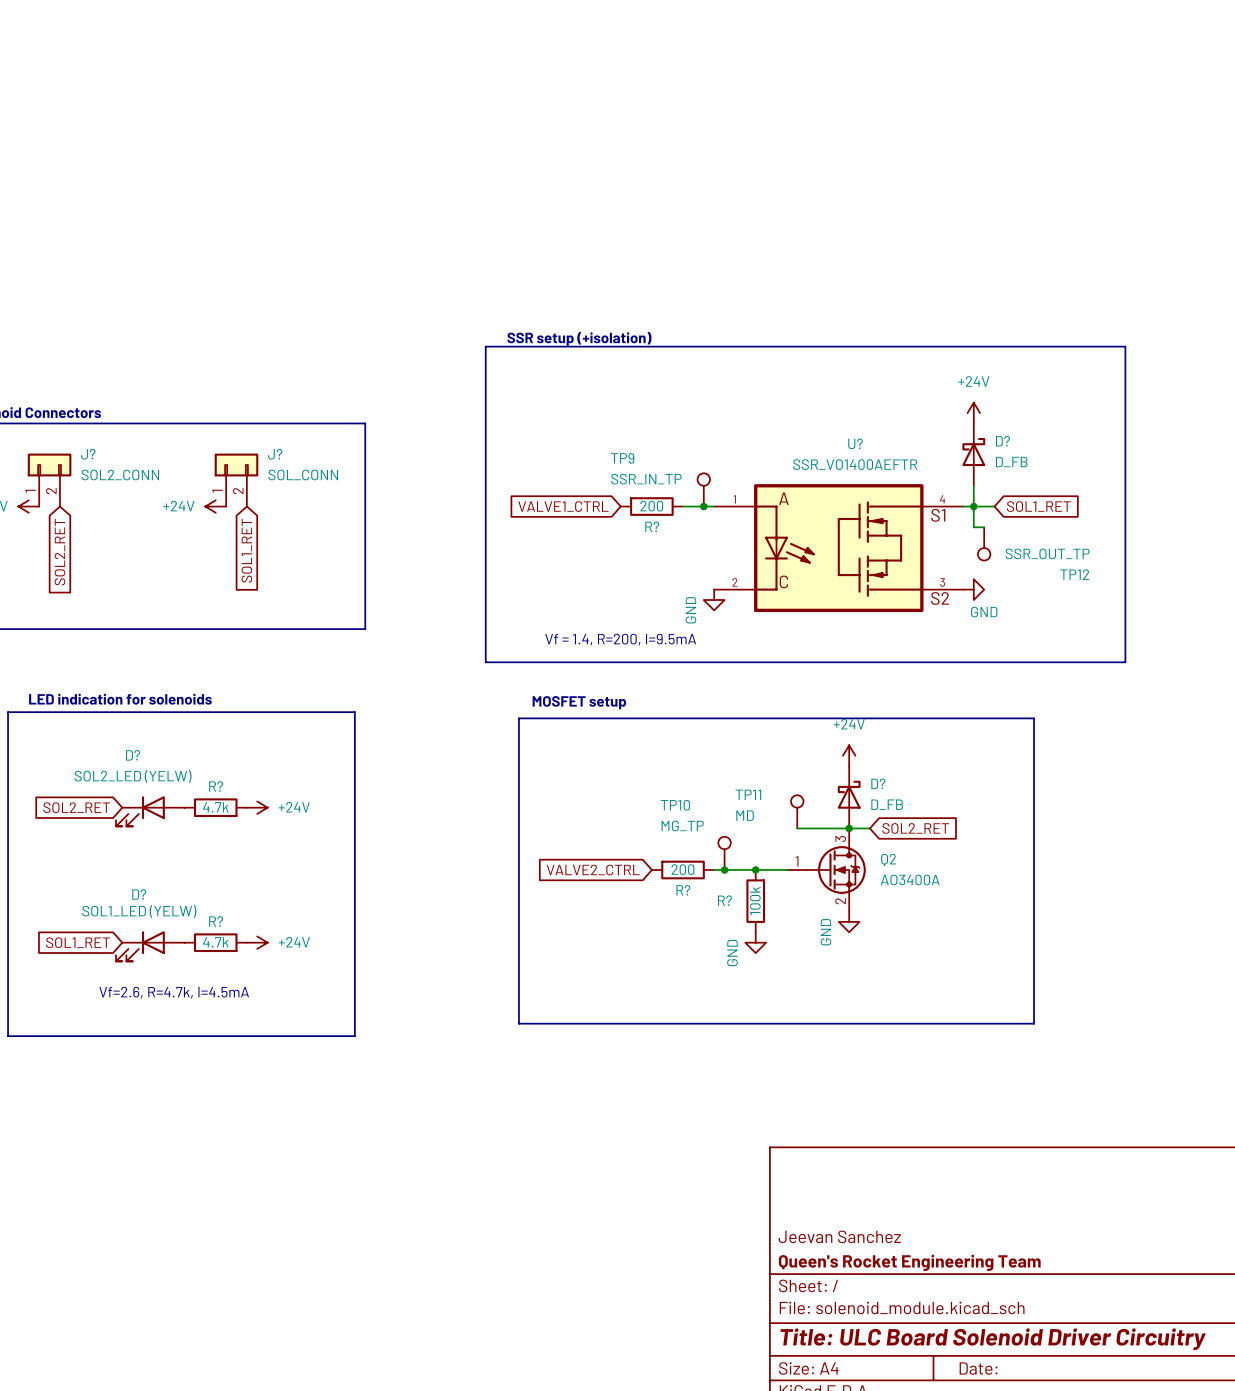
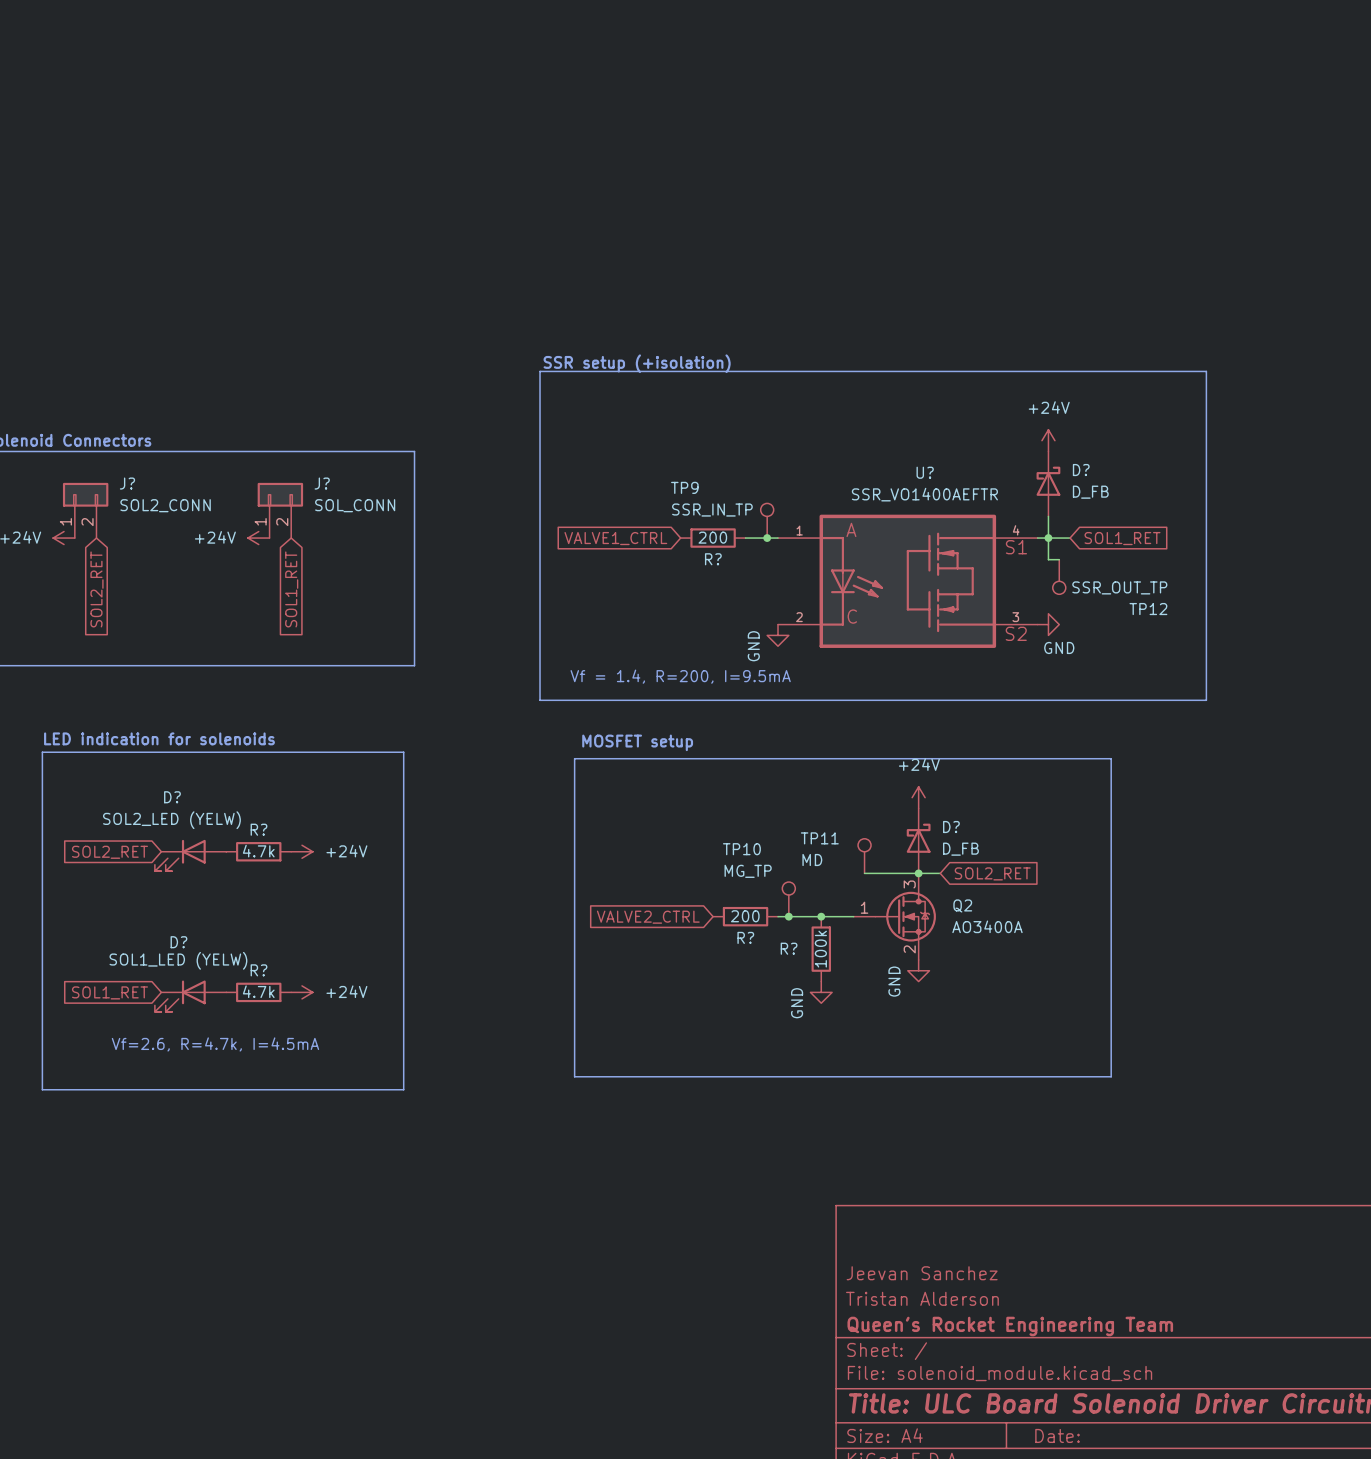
title block: none -> Jeevan Sanchez (922, 1273)
title block: Jeevan Sanchez (839, 1236) -> Tristan Alderson (922, 1298)

